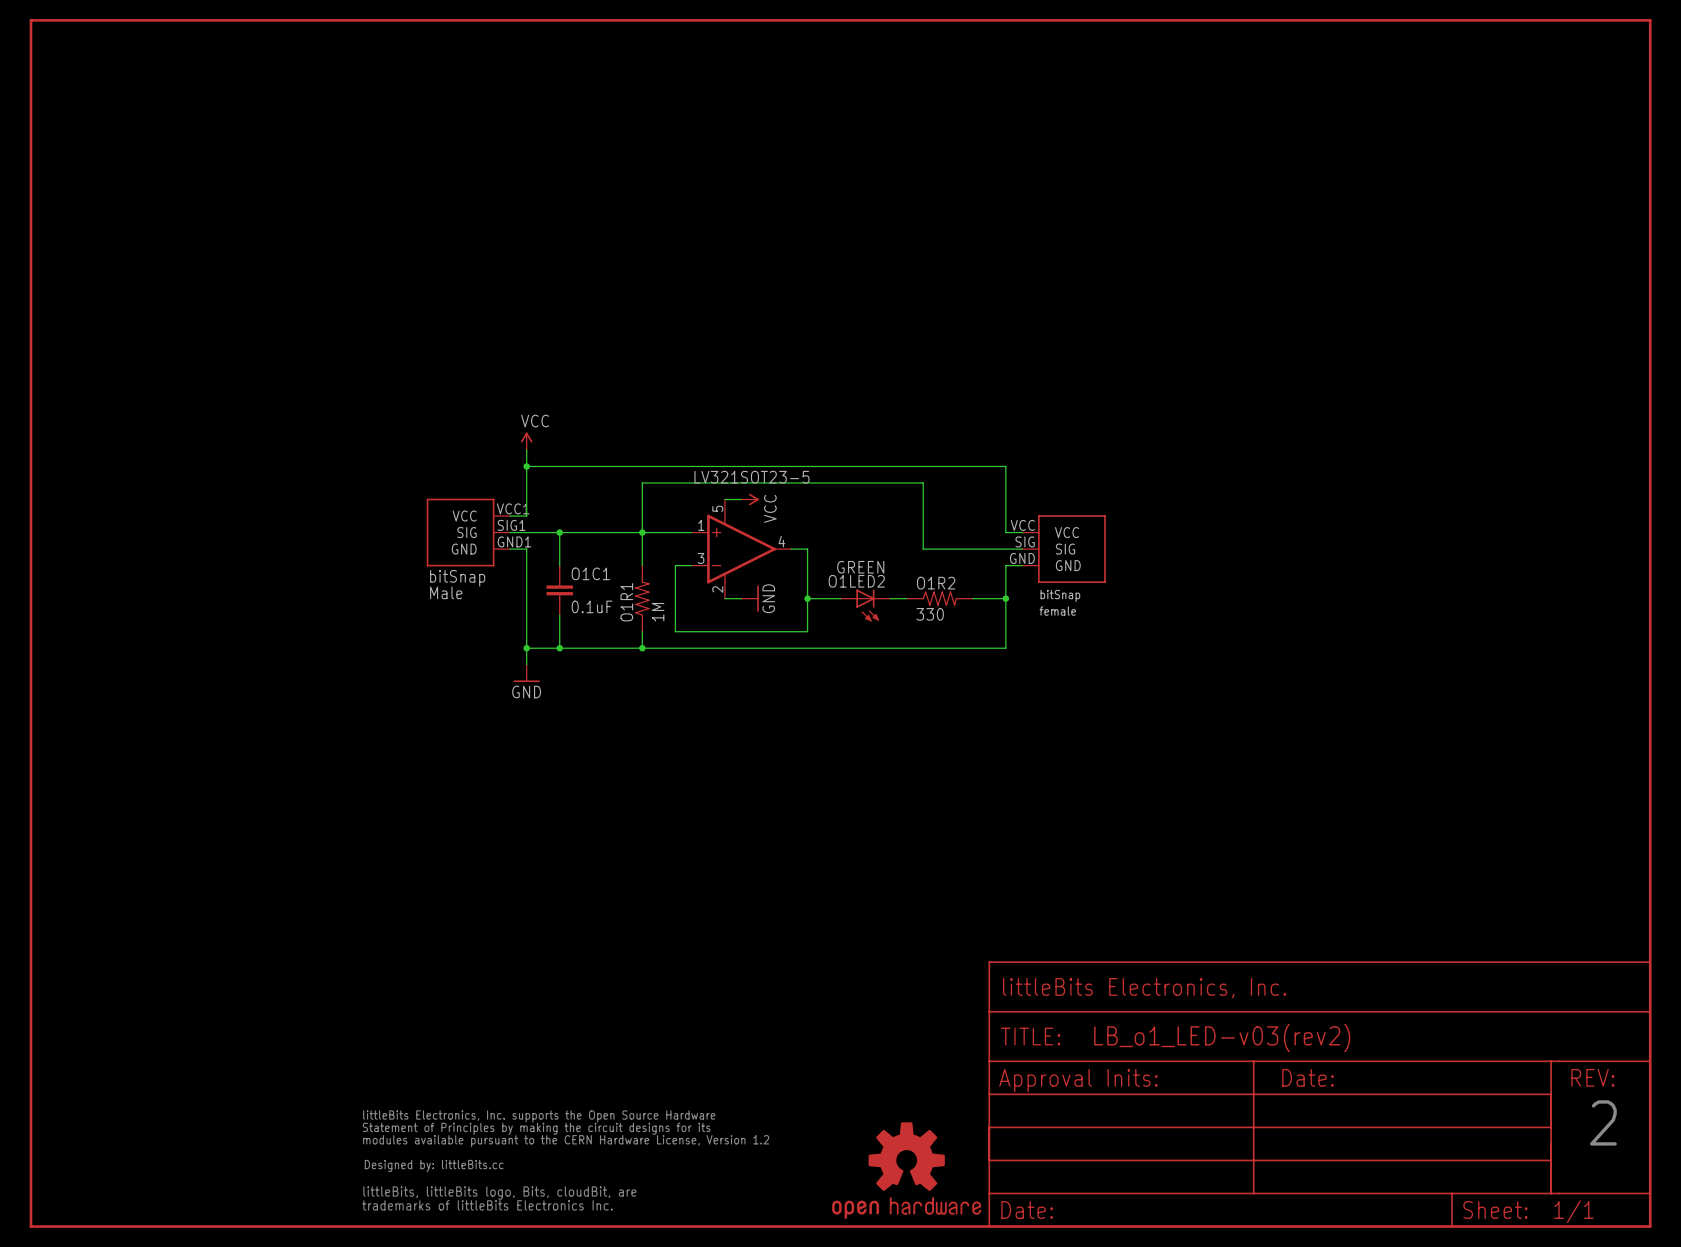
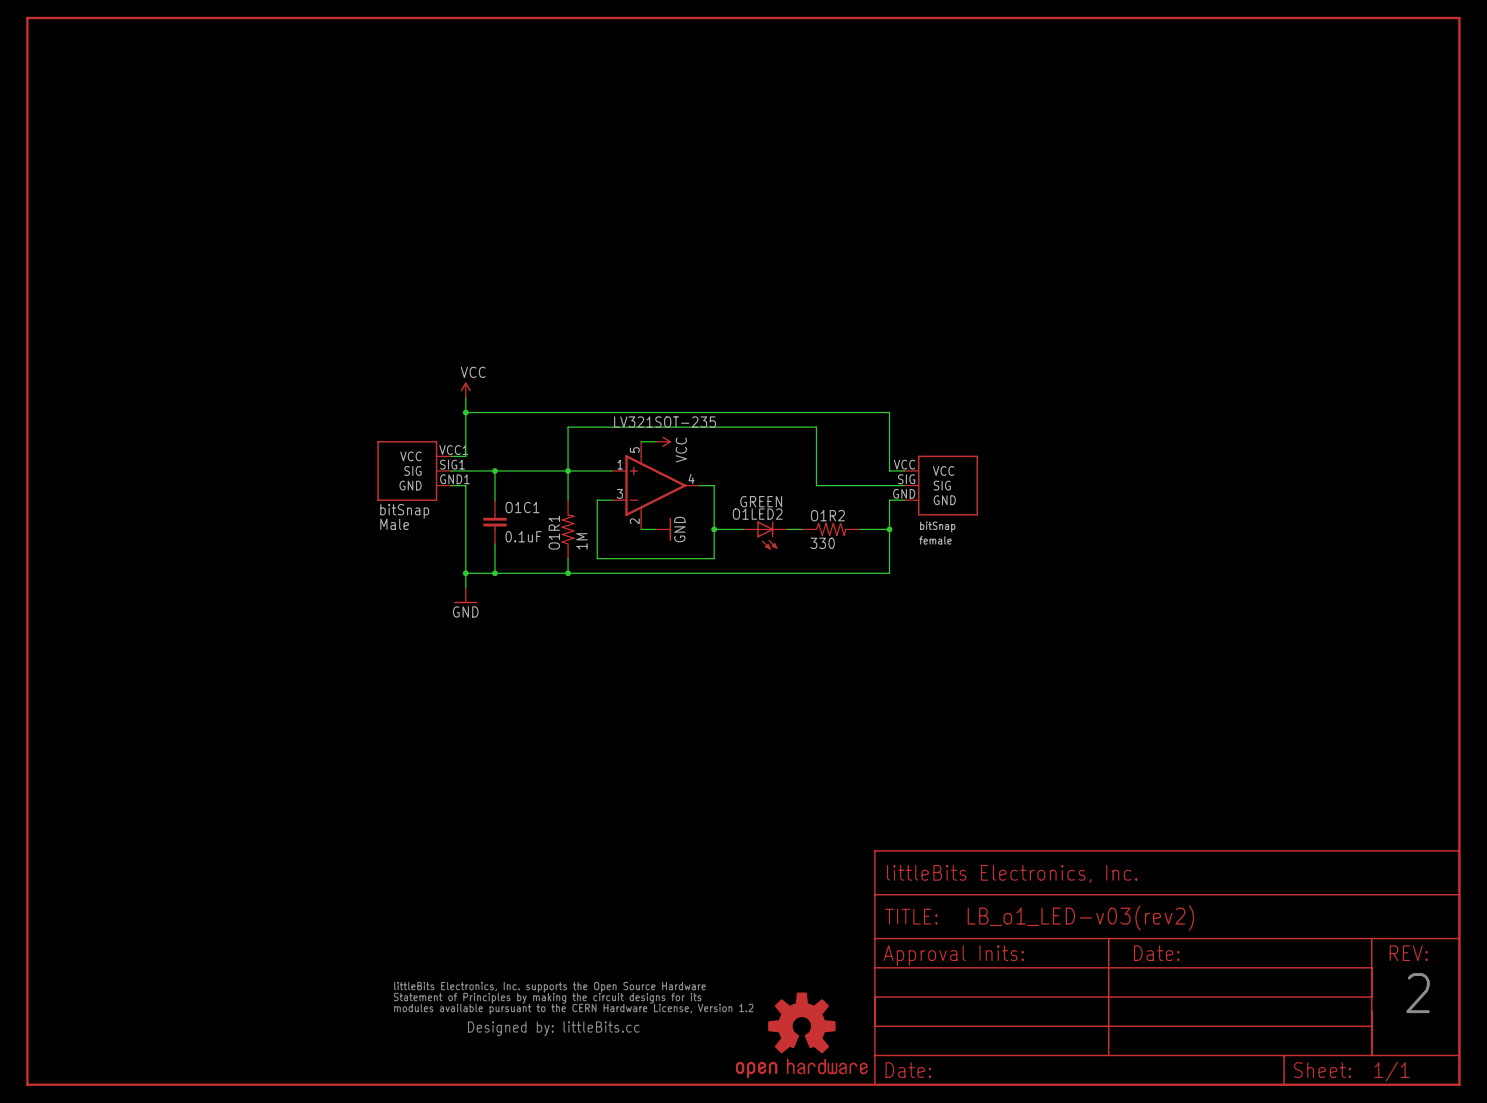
part value: LV321SOT23-5 (751, 477) -> LV321SOT-235 (665, 422)
part: none -> (573, 1009)
part: (565, 1160) -> none

